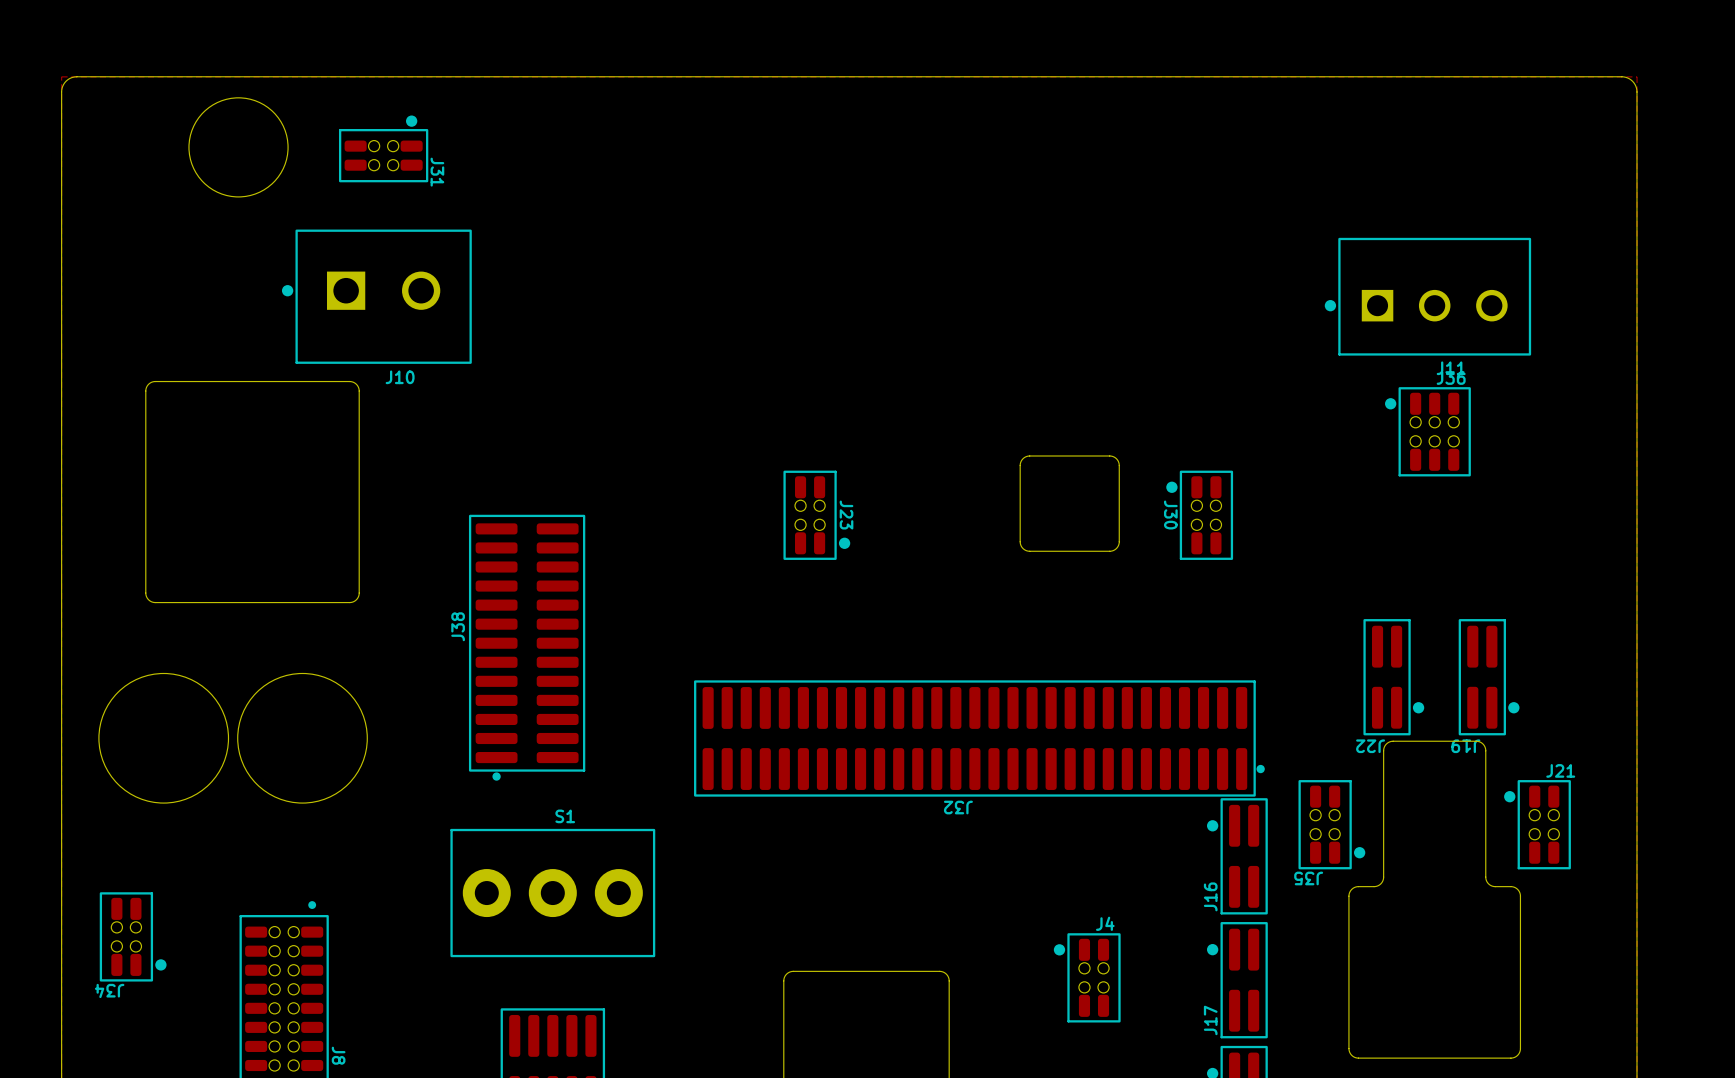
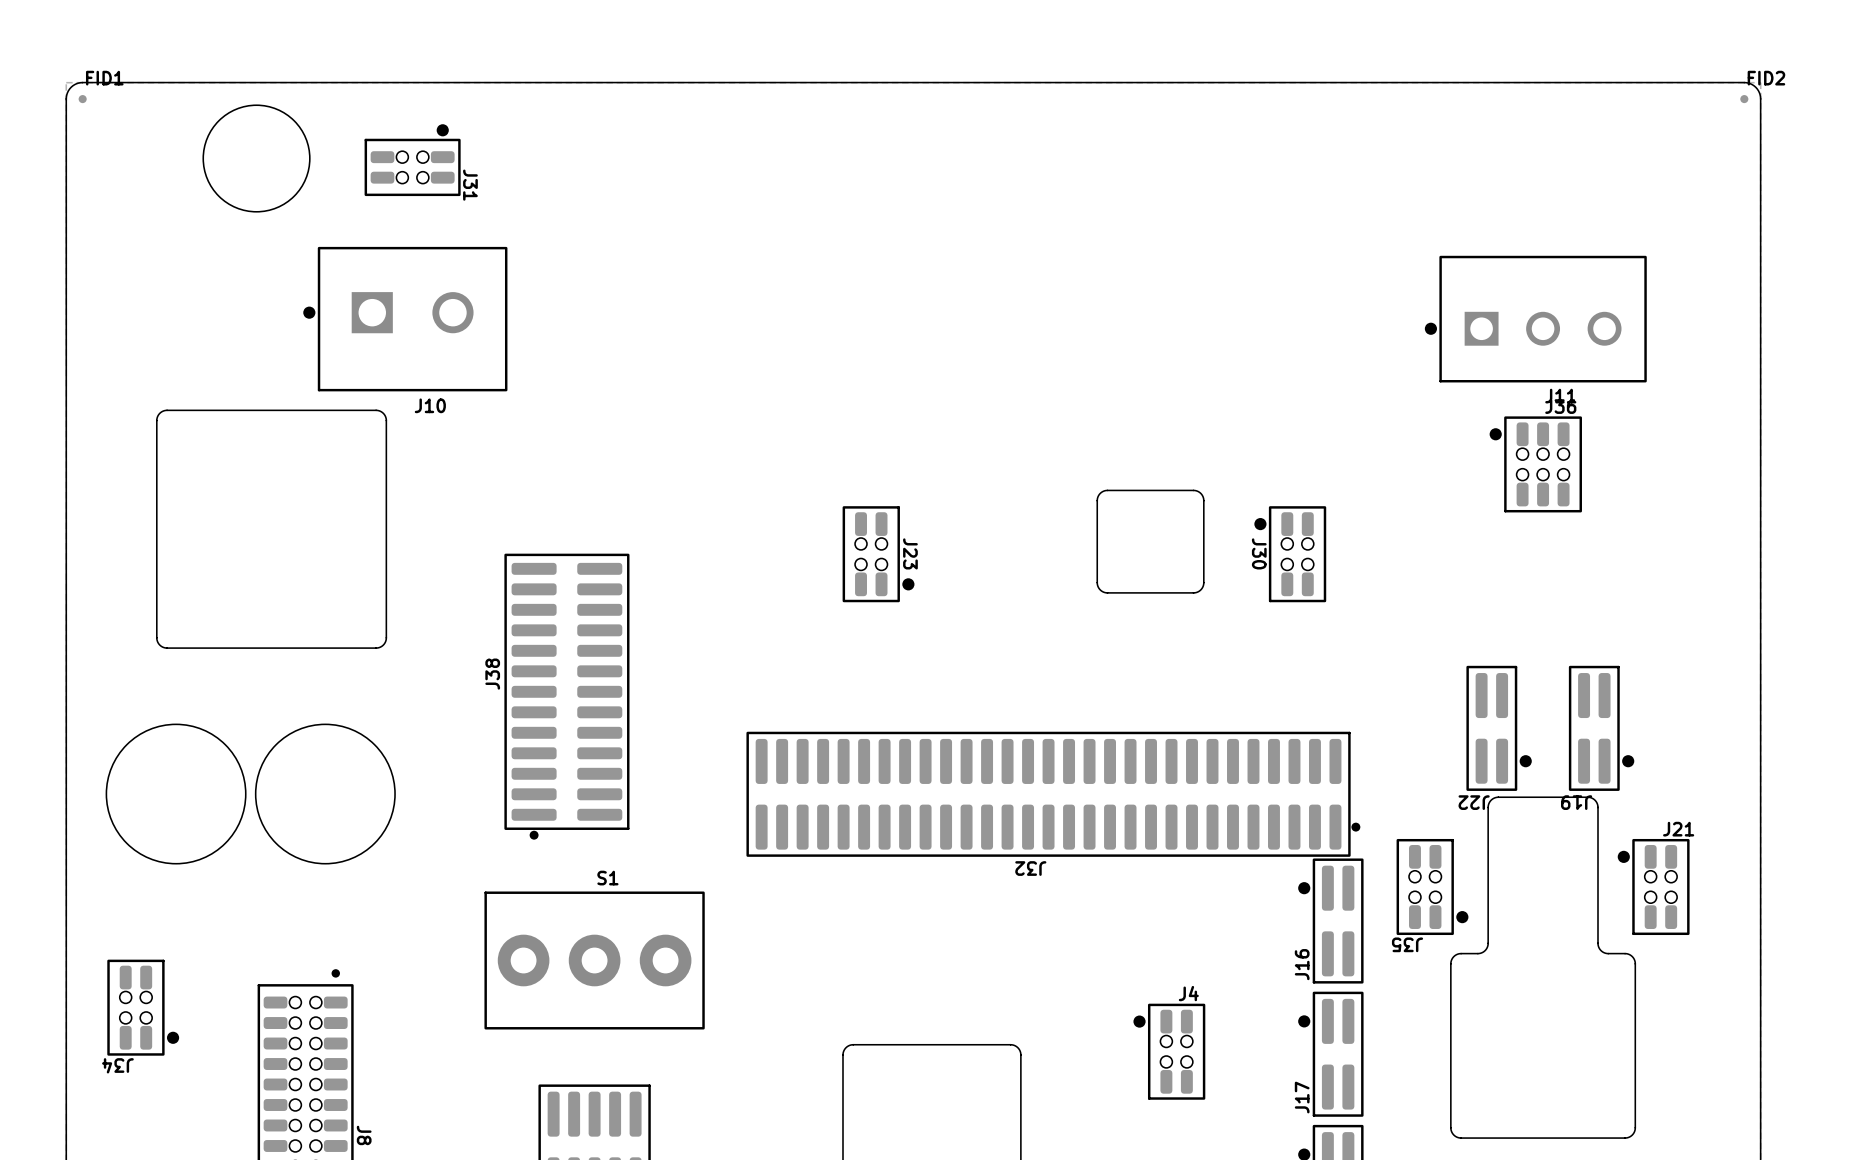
FID1: none -> (82, 99)
FID2: none -> (1744, 99)

